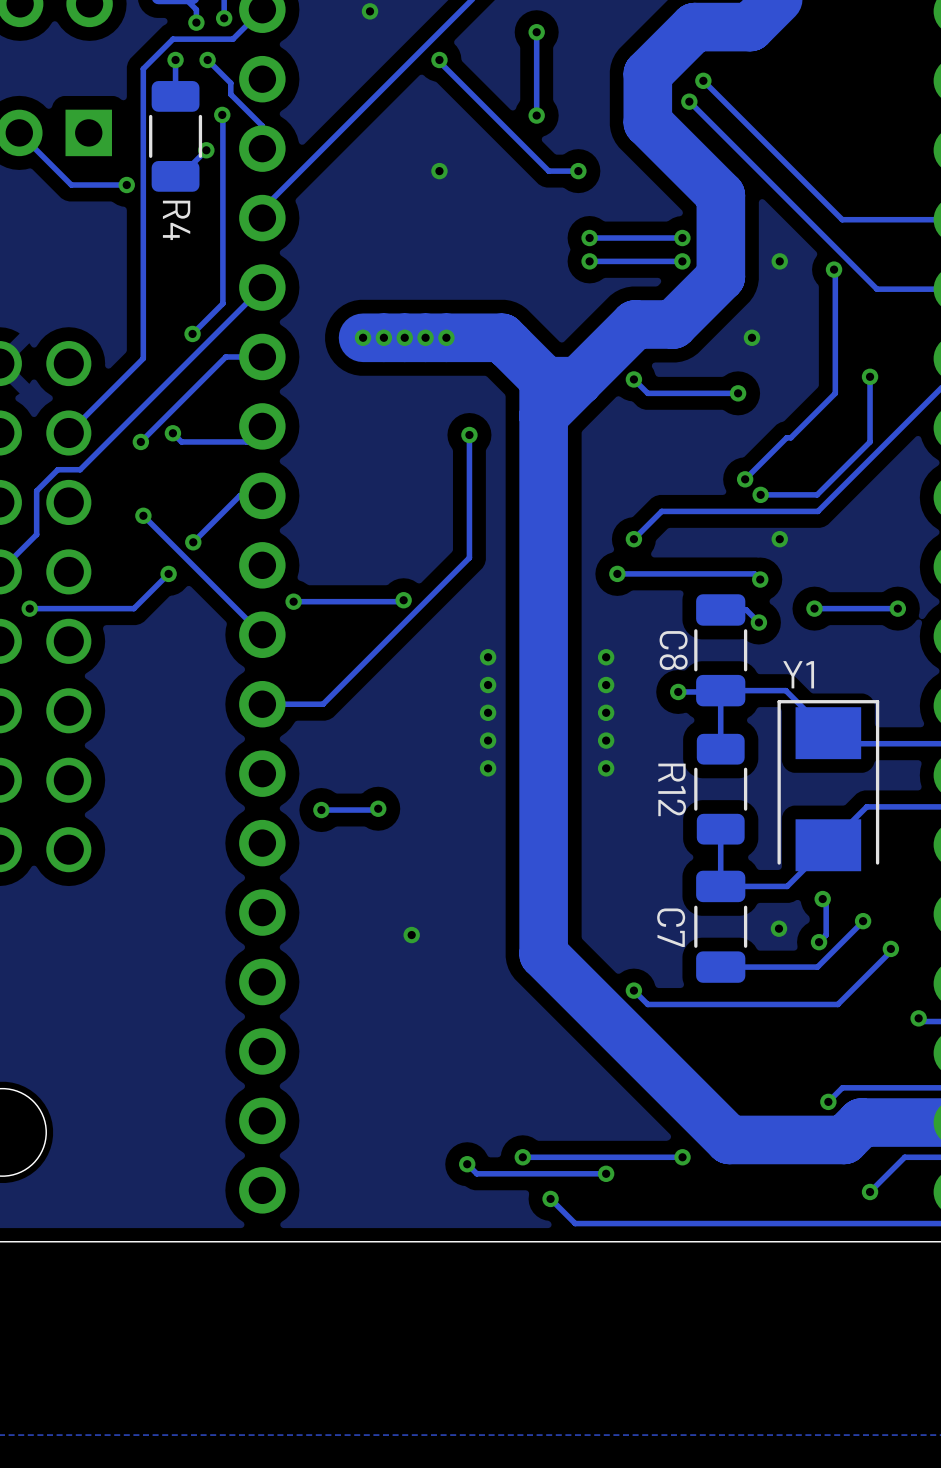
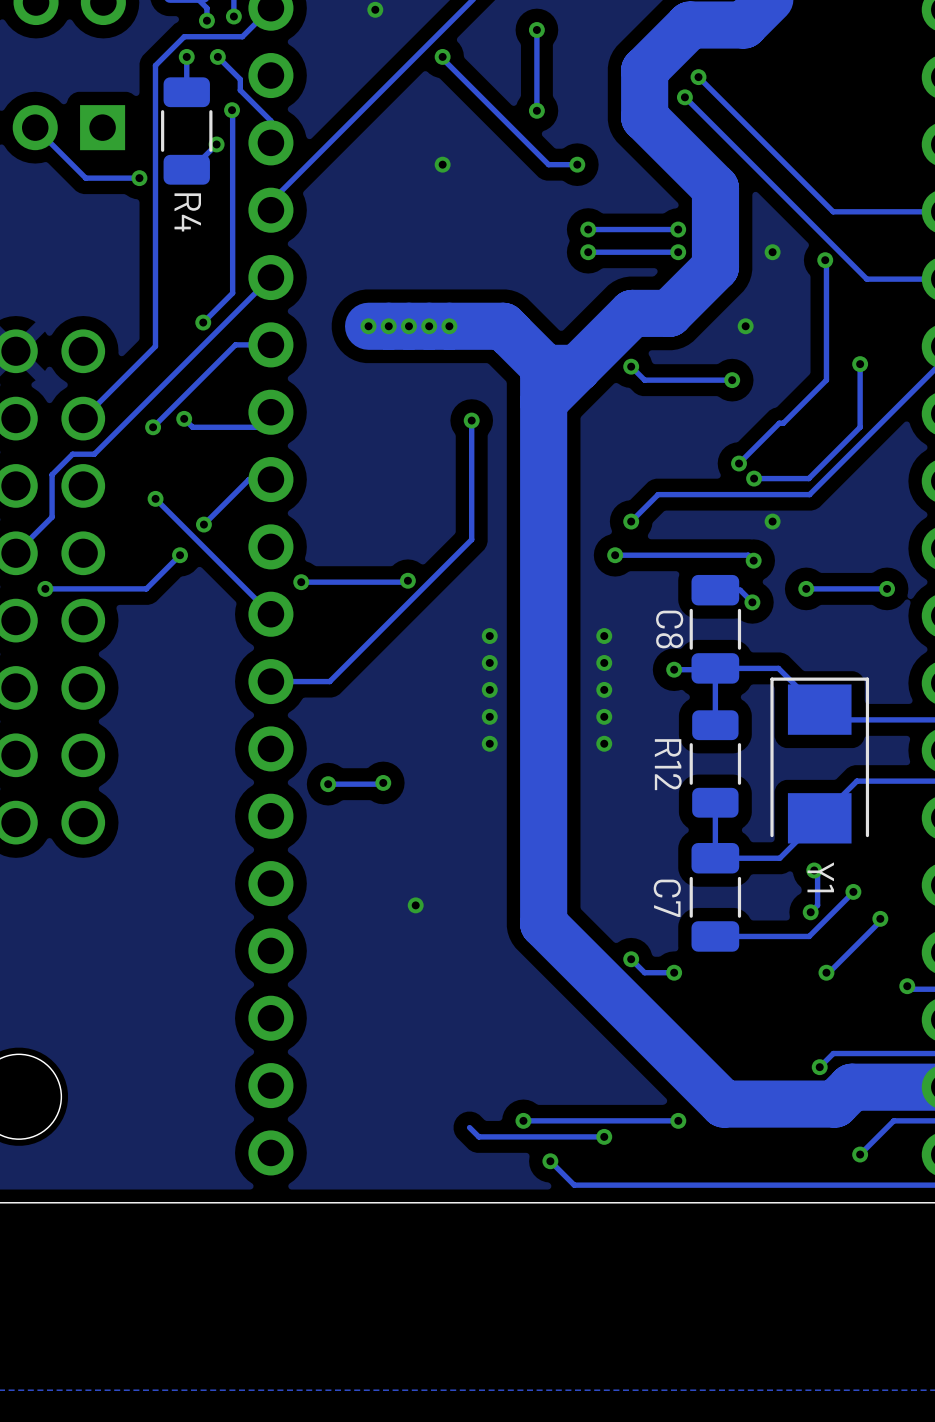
Y1 name rotation: 0° (798, 674) -> 90° clockwise (820, 877)
Y1 name position: Y1 (798, 674) -> Y1 (820, 877)
via: (778, 928) -> none
via: none -> (674, 972)
track: (835, 1004) (678, 1004) -> none
via: none -> (826, 972)
via: (467, 1164) -> none

